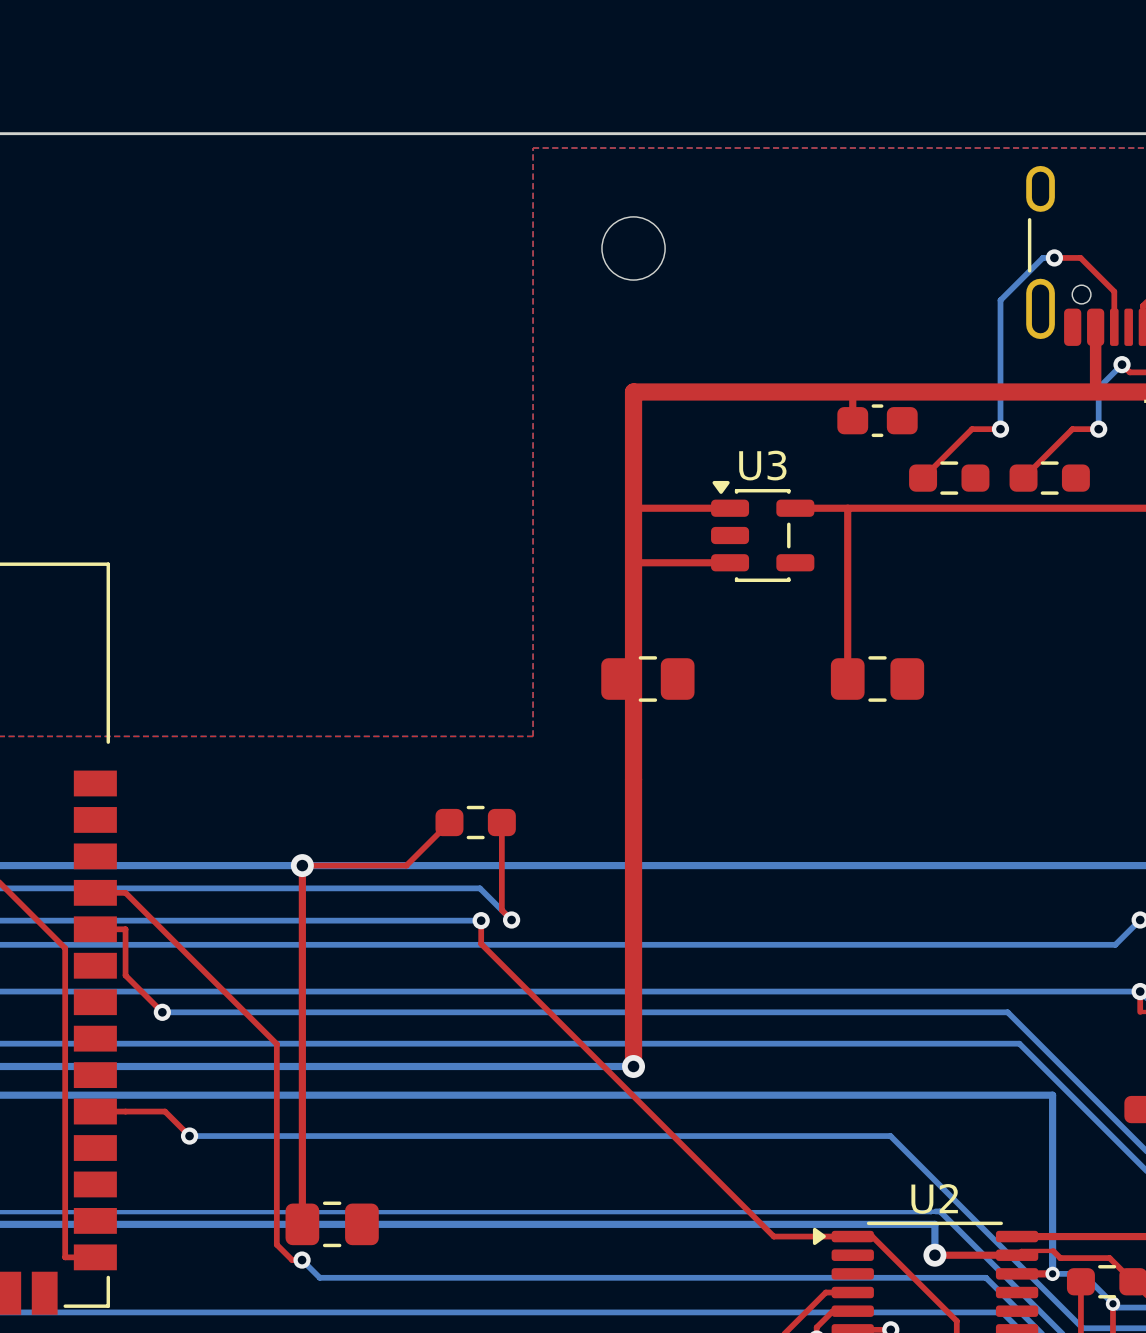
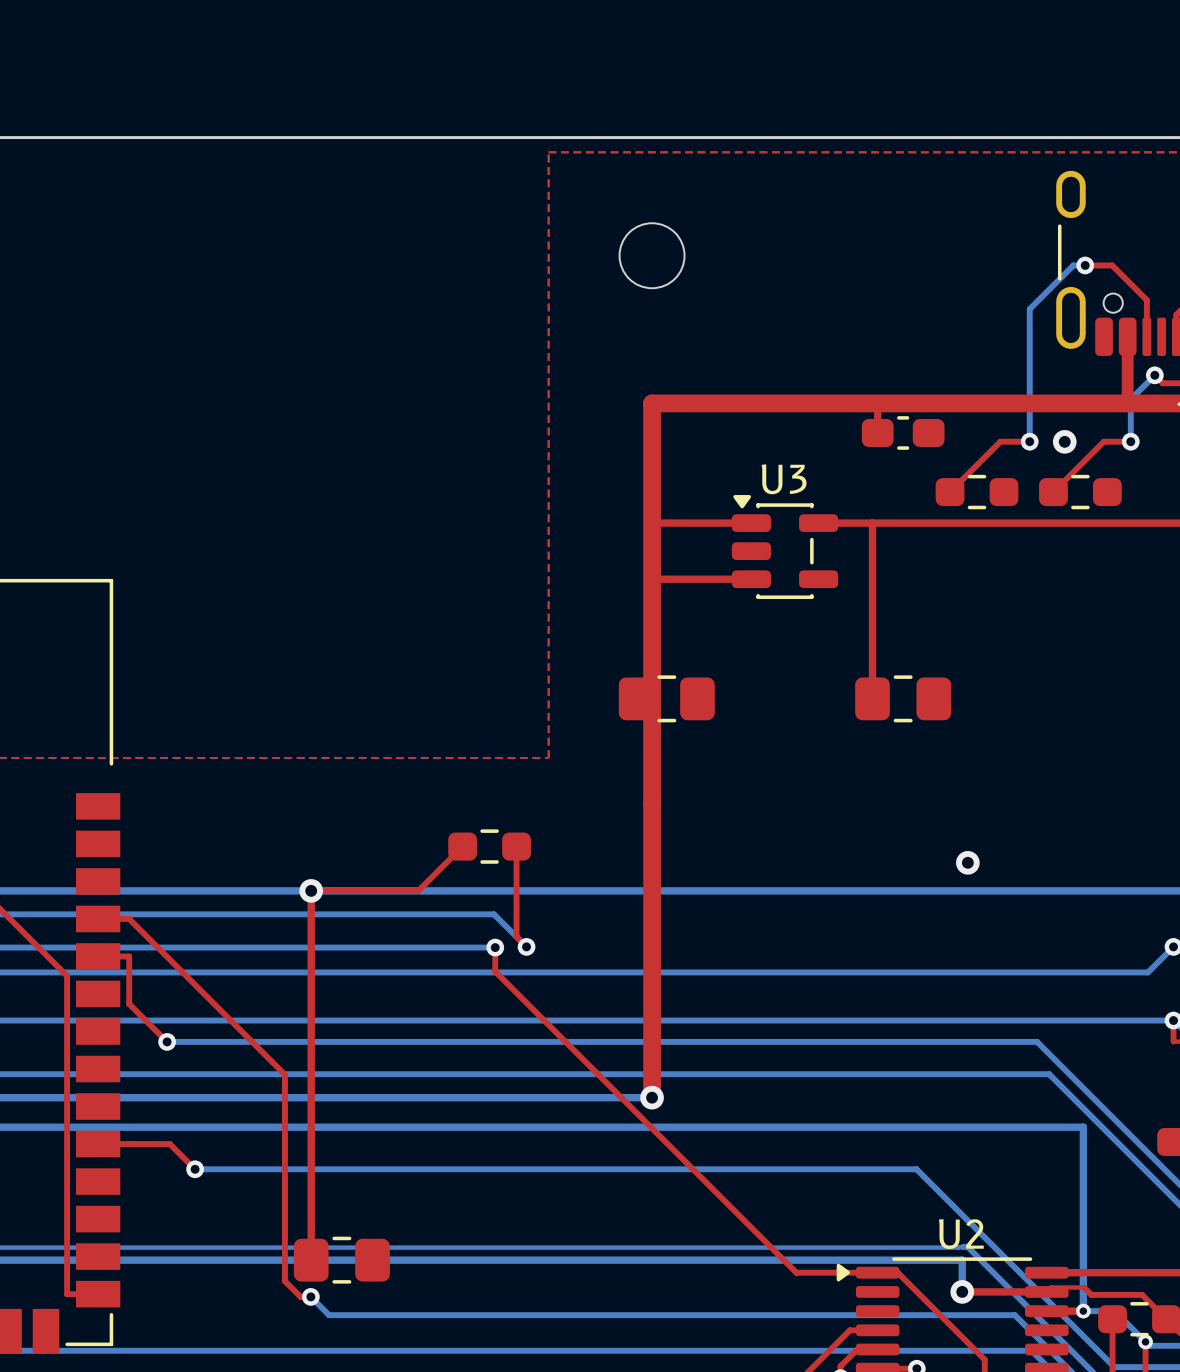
via: none -> (1064, 441)
via: none -> (967, 862)

